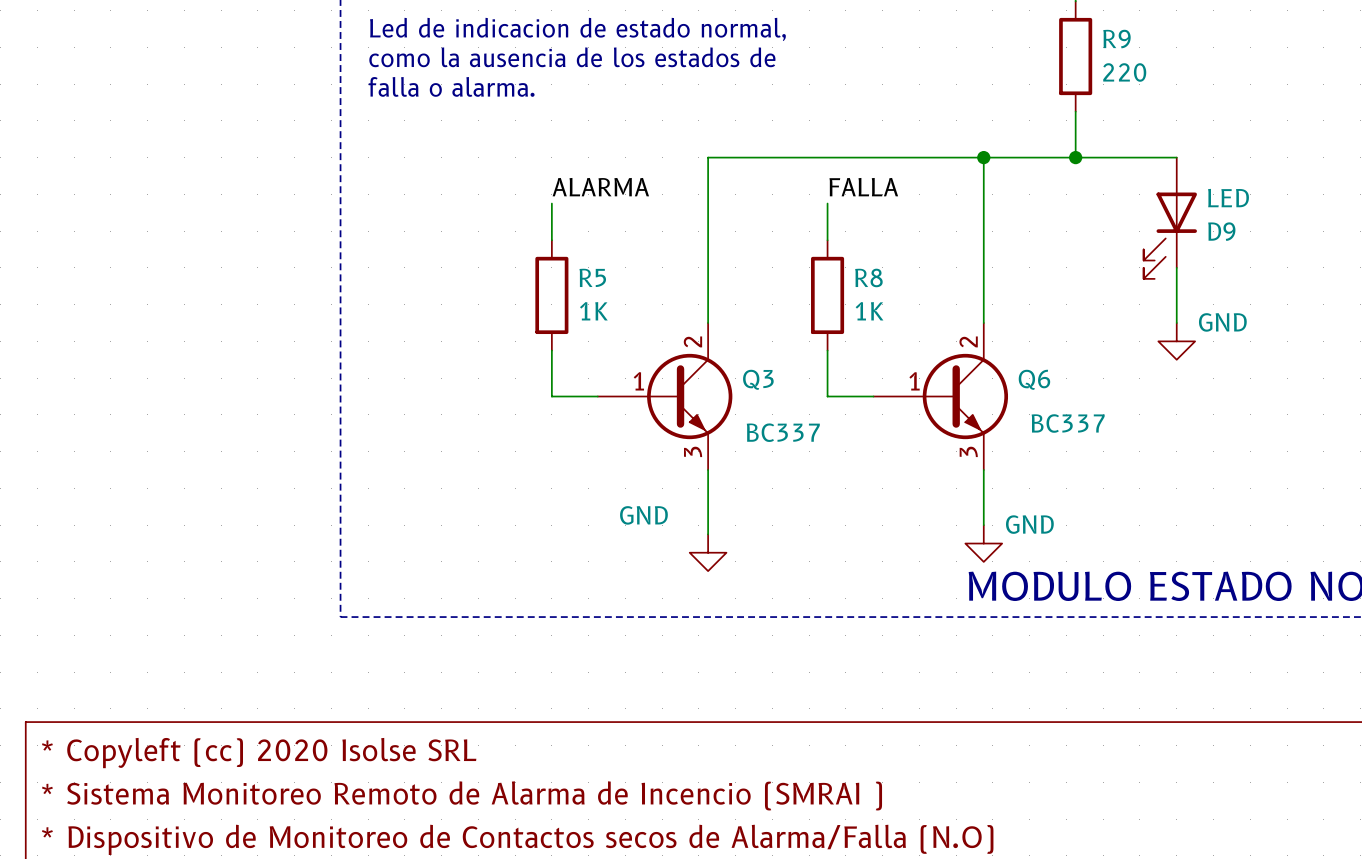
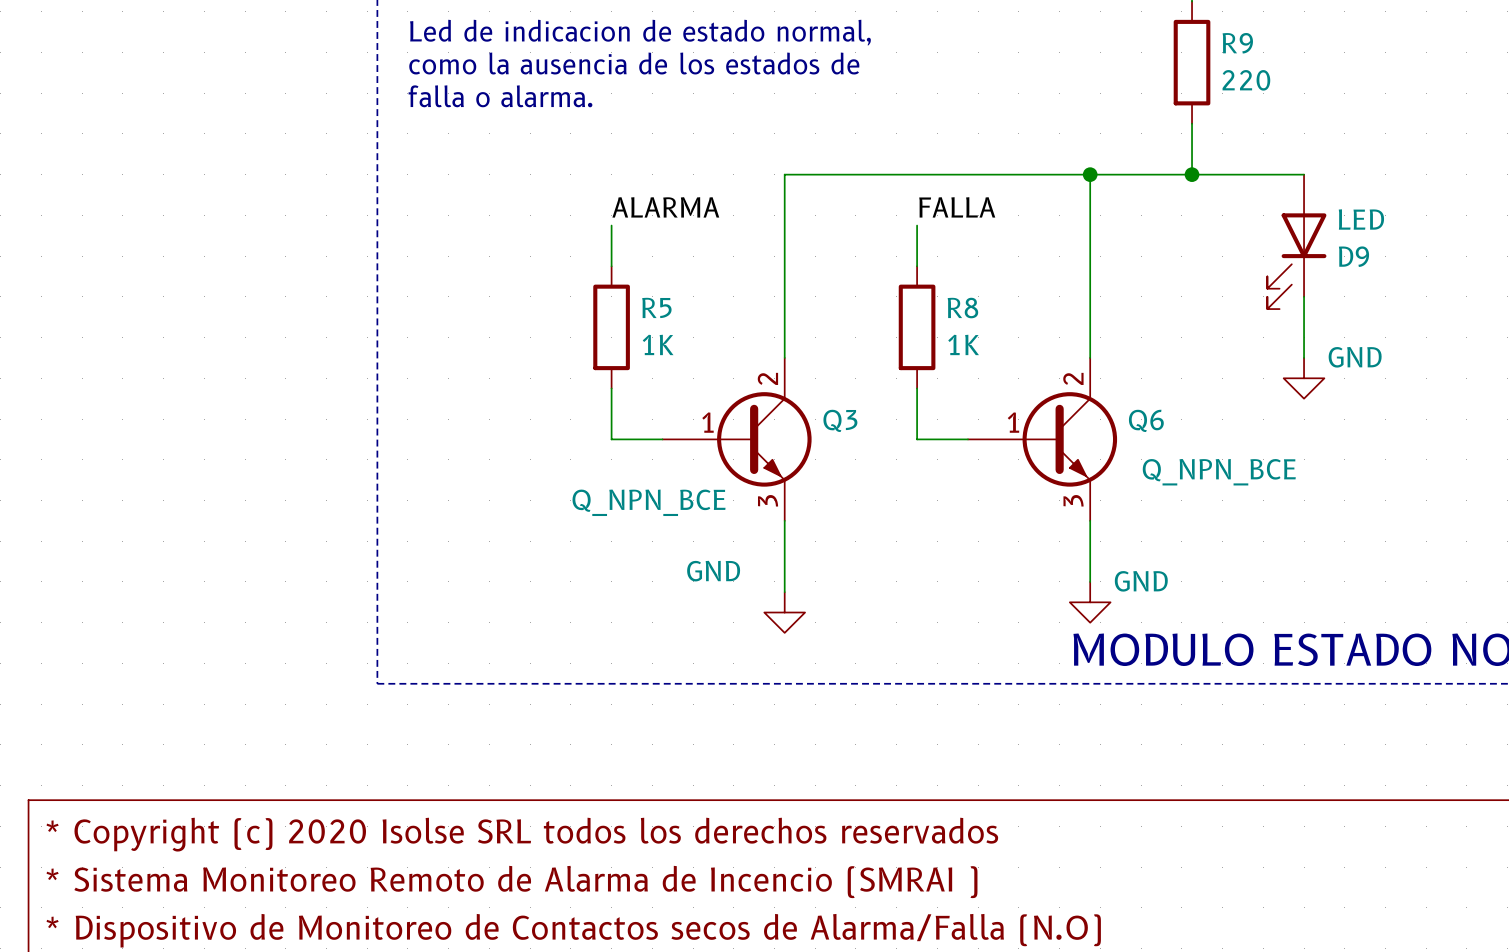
Q6 value: BC337 (1068, 423) -> Q_NPN_BCE (1219, 472)
Q3 value: BC337 (783, 432) -> Q_NPN_BCE (649, 502)
title block: * Copyleft (cc) 2020 Isolse SRL (259, 753) -> * Copyright (c) 2020 Isolse SRL todos los derechos reservados (522, 834)

